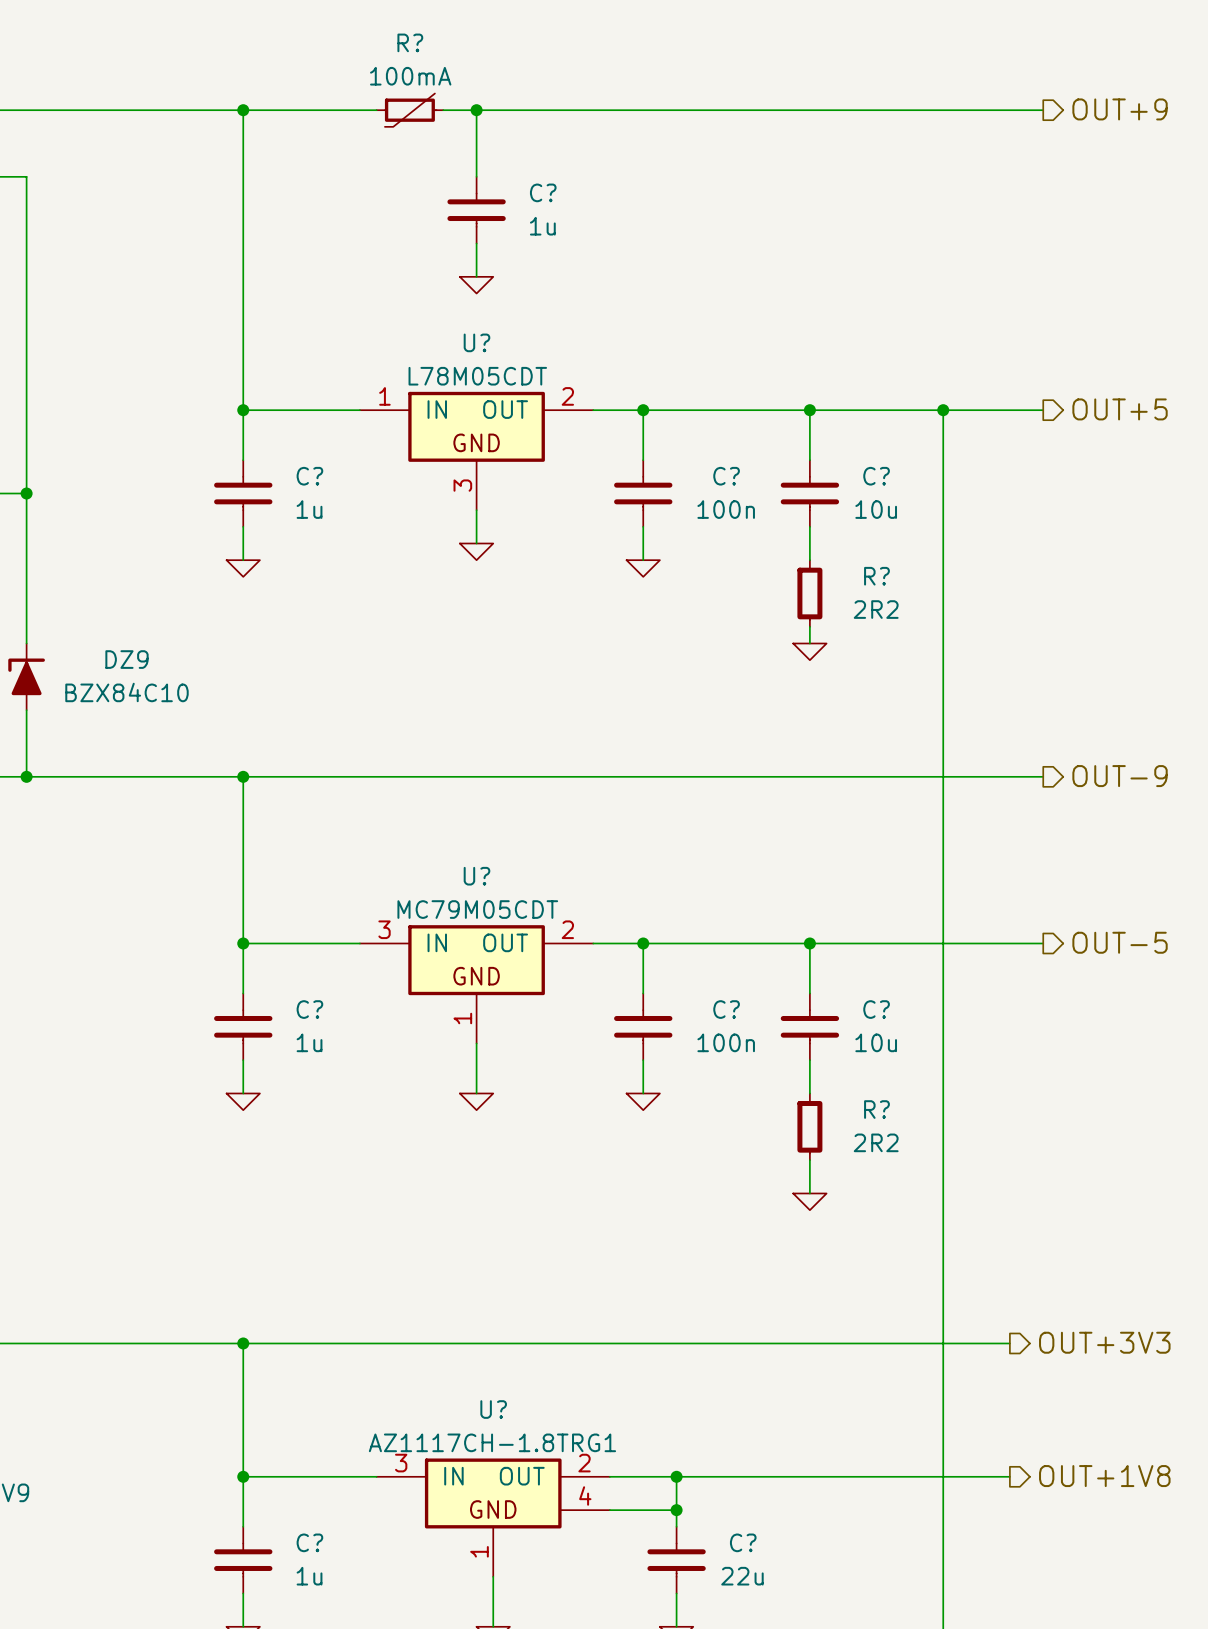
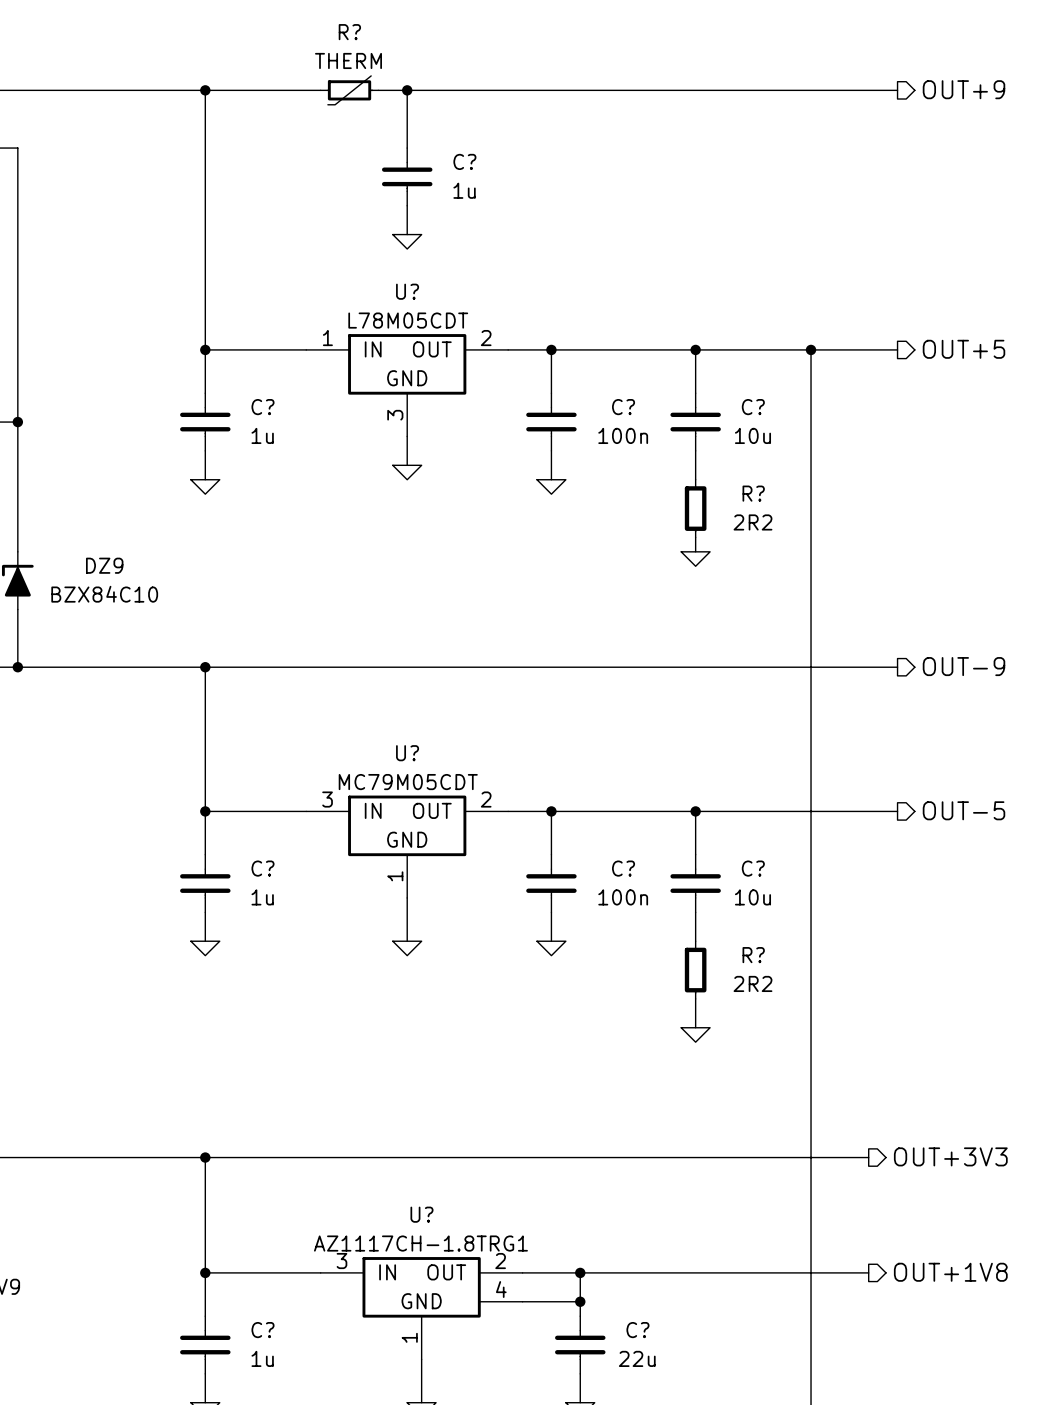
R? value: 100mA (410, 76) -> THERM (348, 60)

